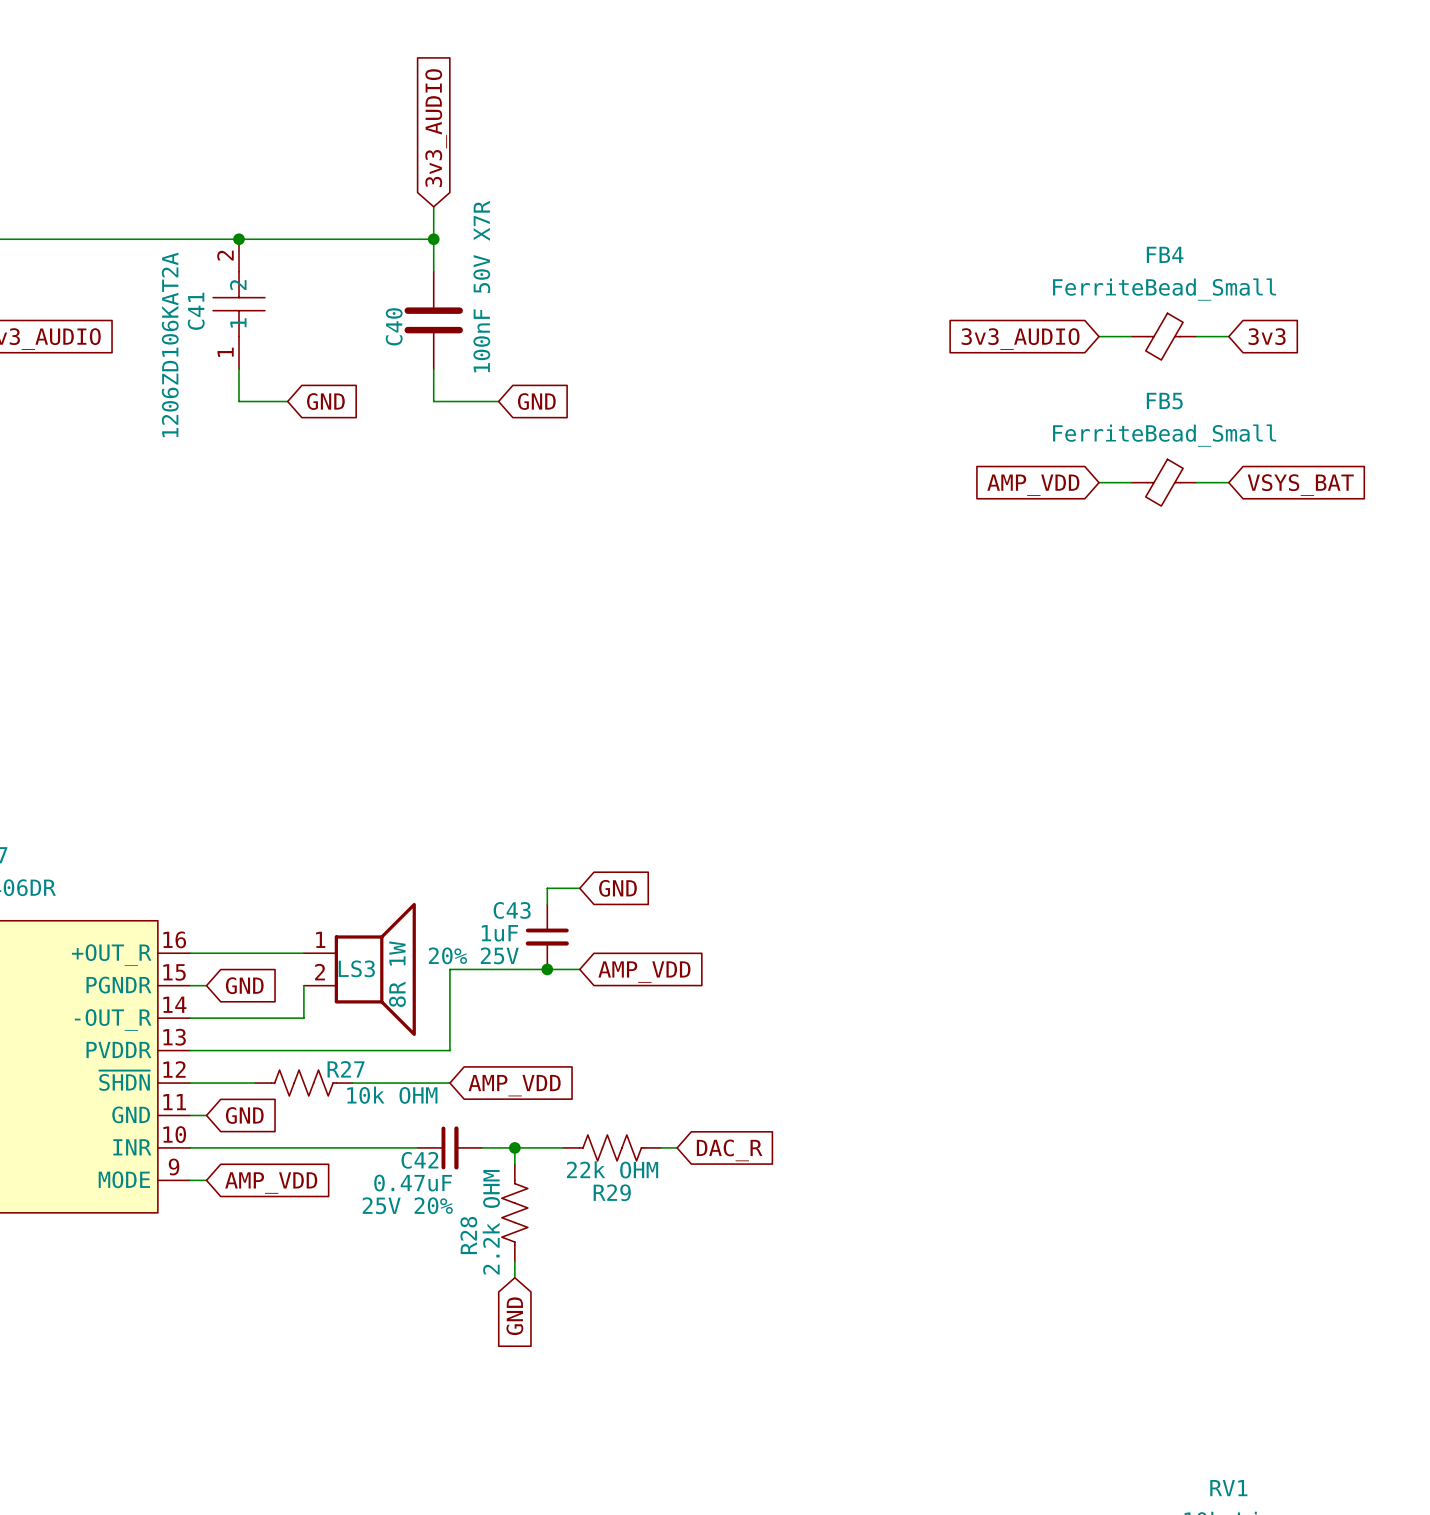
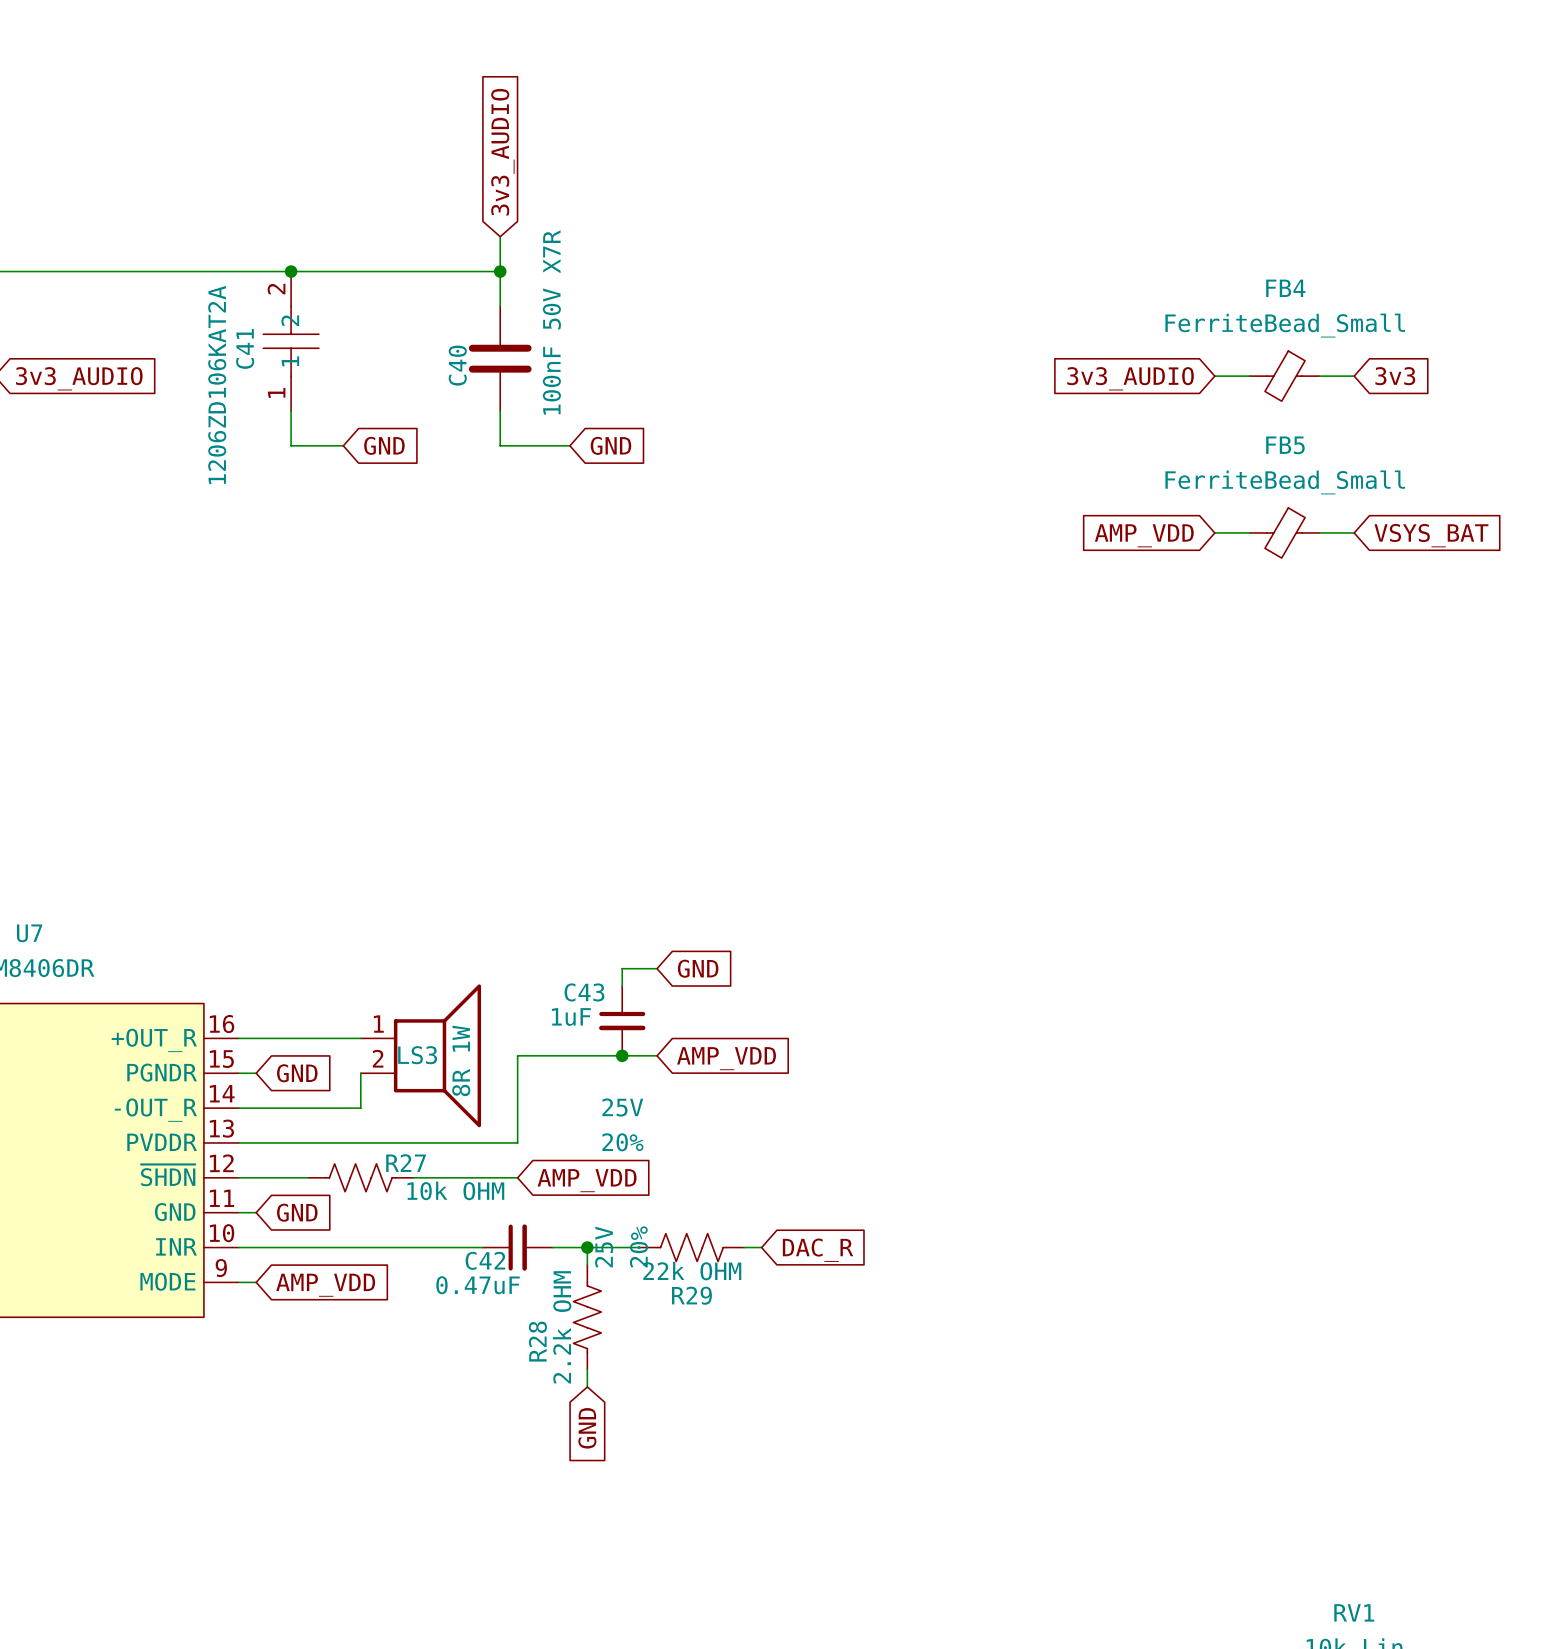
C43 text position: 20% (447, 955) -> 20% (622, 1142)
C43 text position: 25V (499, 955) -> 25V (622, 1107)
C42 text rotation: 0° (381, 1205) -> 90° counterclockwise (604, 1246)
C42 text position: 25V (381, 1205) -> 25V (604, 1246)
C42 text rotation: 0° (433, 1205) -> 90° counterclockwise (639, 1246)
C42 text position: 20% (433, 1205) -> 20% (639, 1246)

